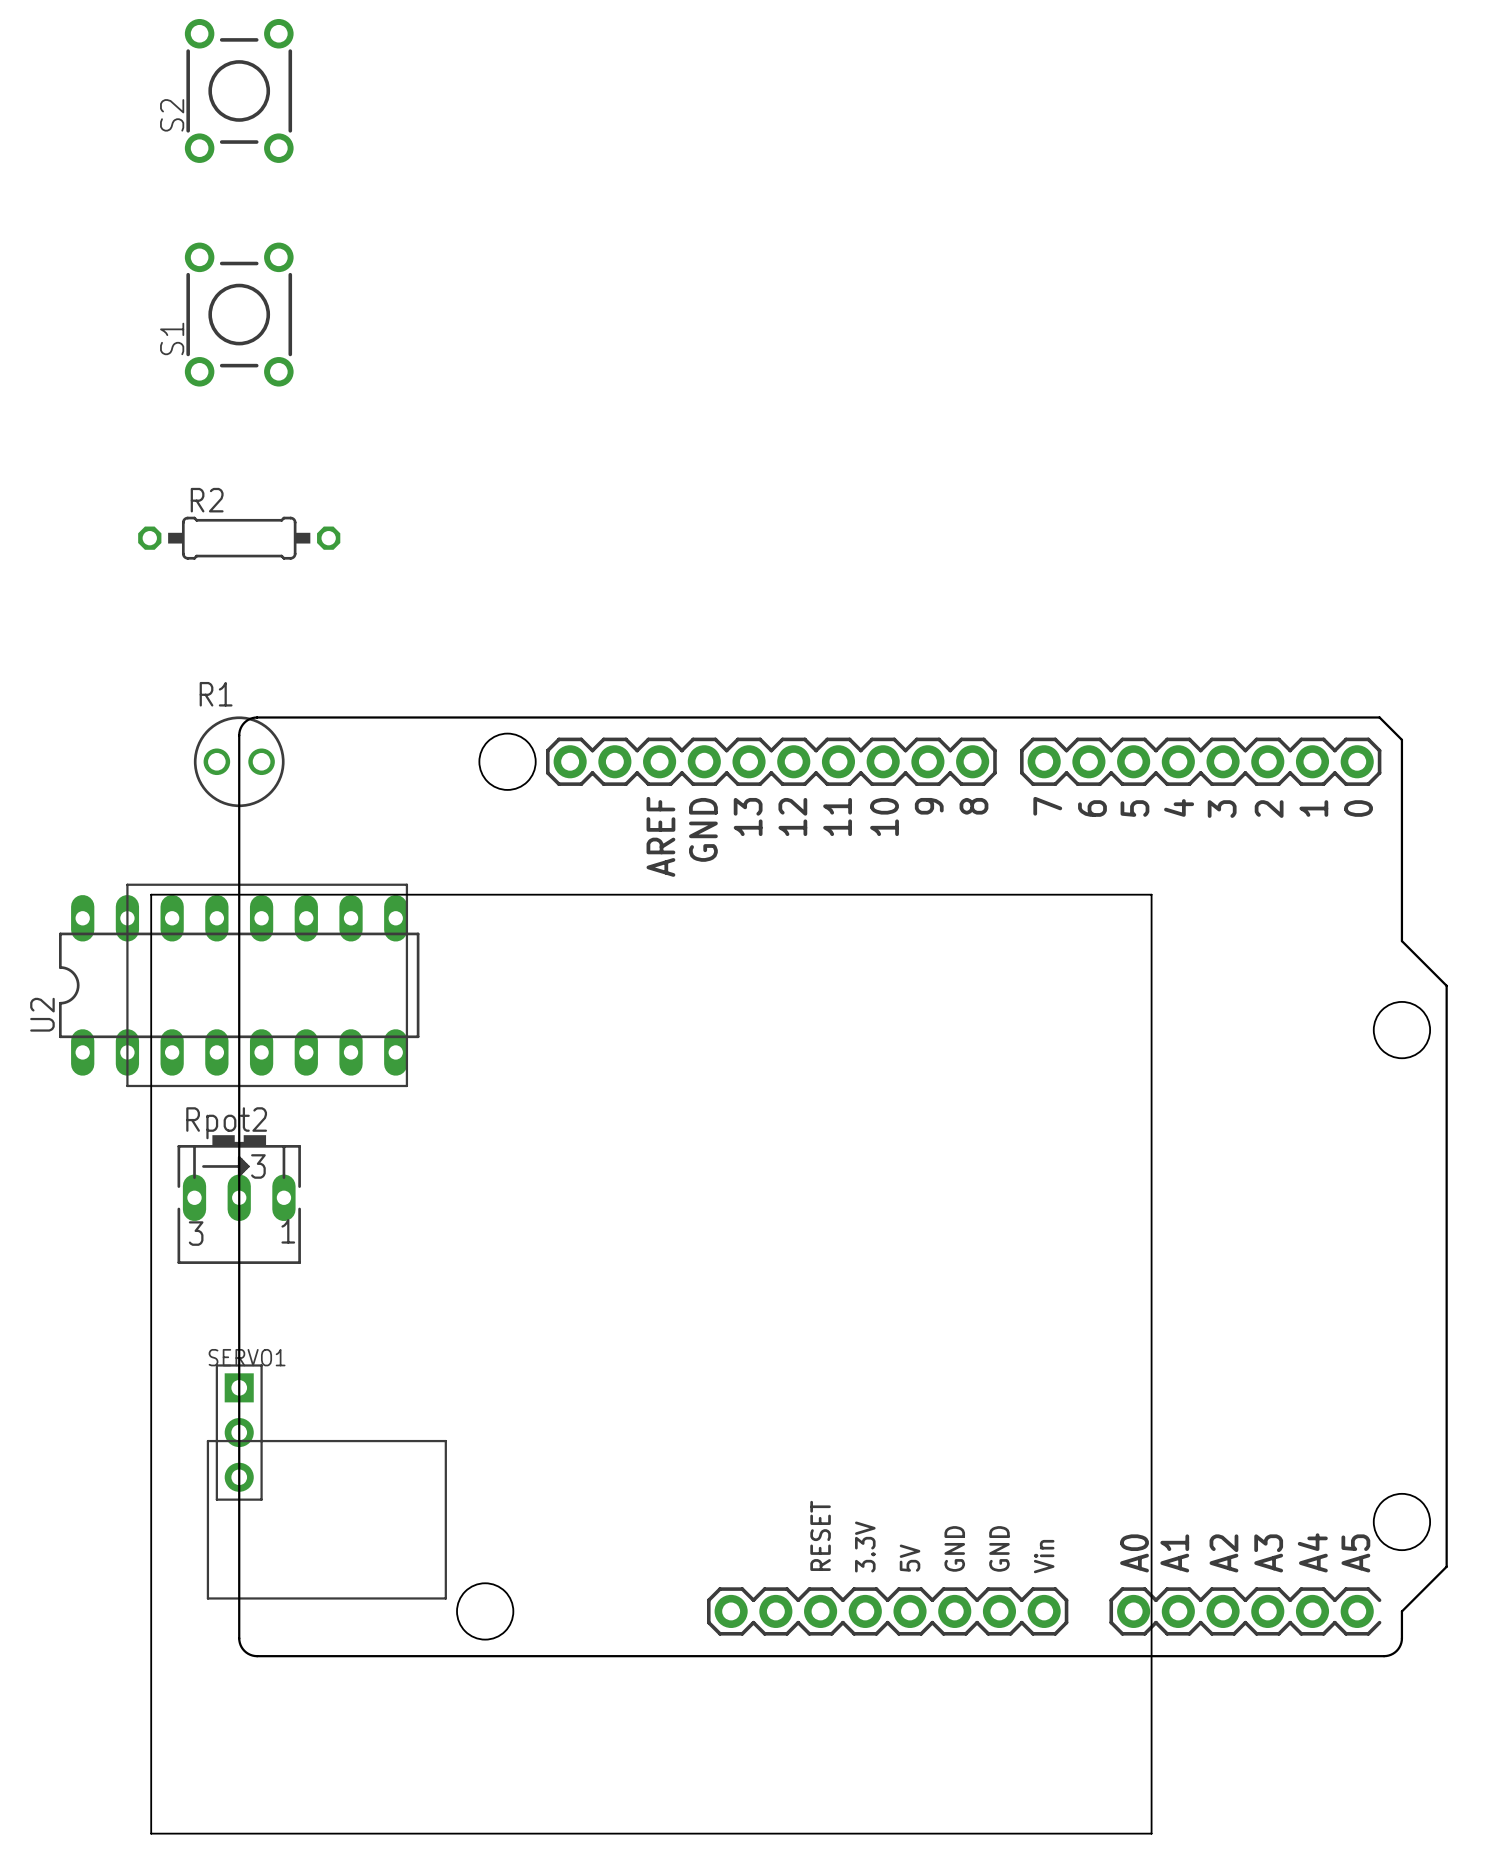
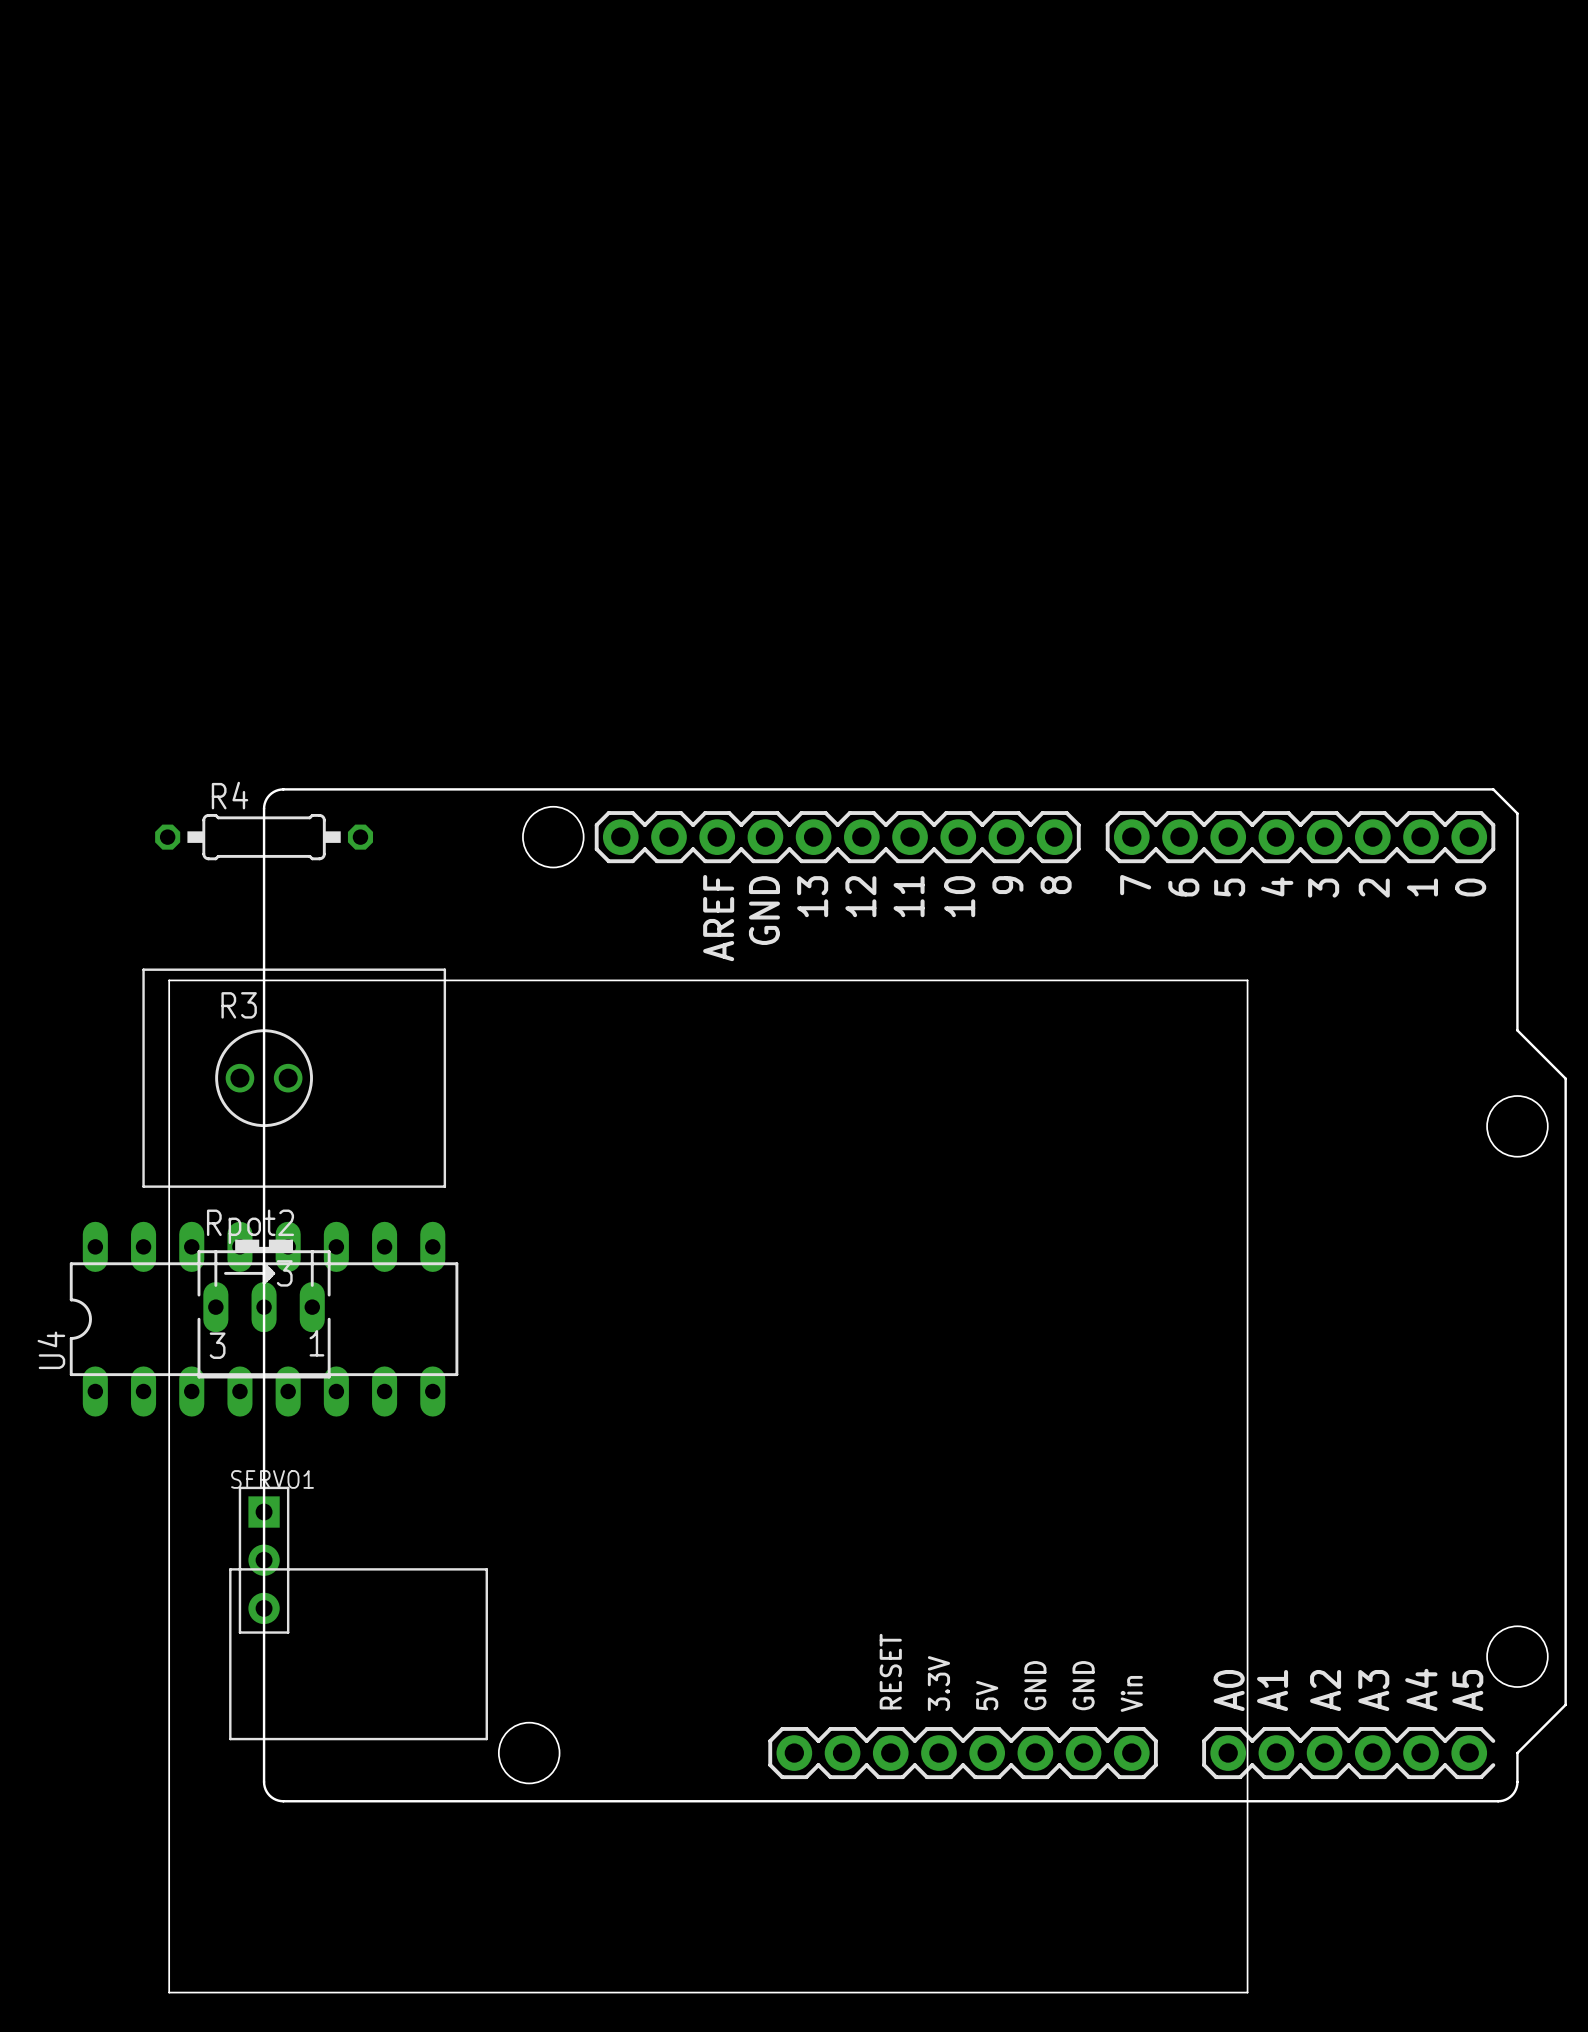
S2: (239, 90) -> none
S1: (239, 314) -> none
R2: (239, 538) -> none
R1: (239, 761) -> none
R4: none -> (264, 837)
U2: (239, 985) -> none
R3: none -> (264, 1078)
U4: none -> (264, 1319)

